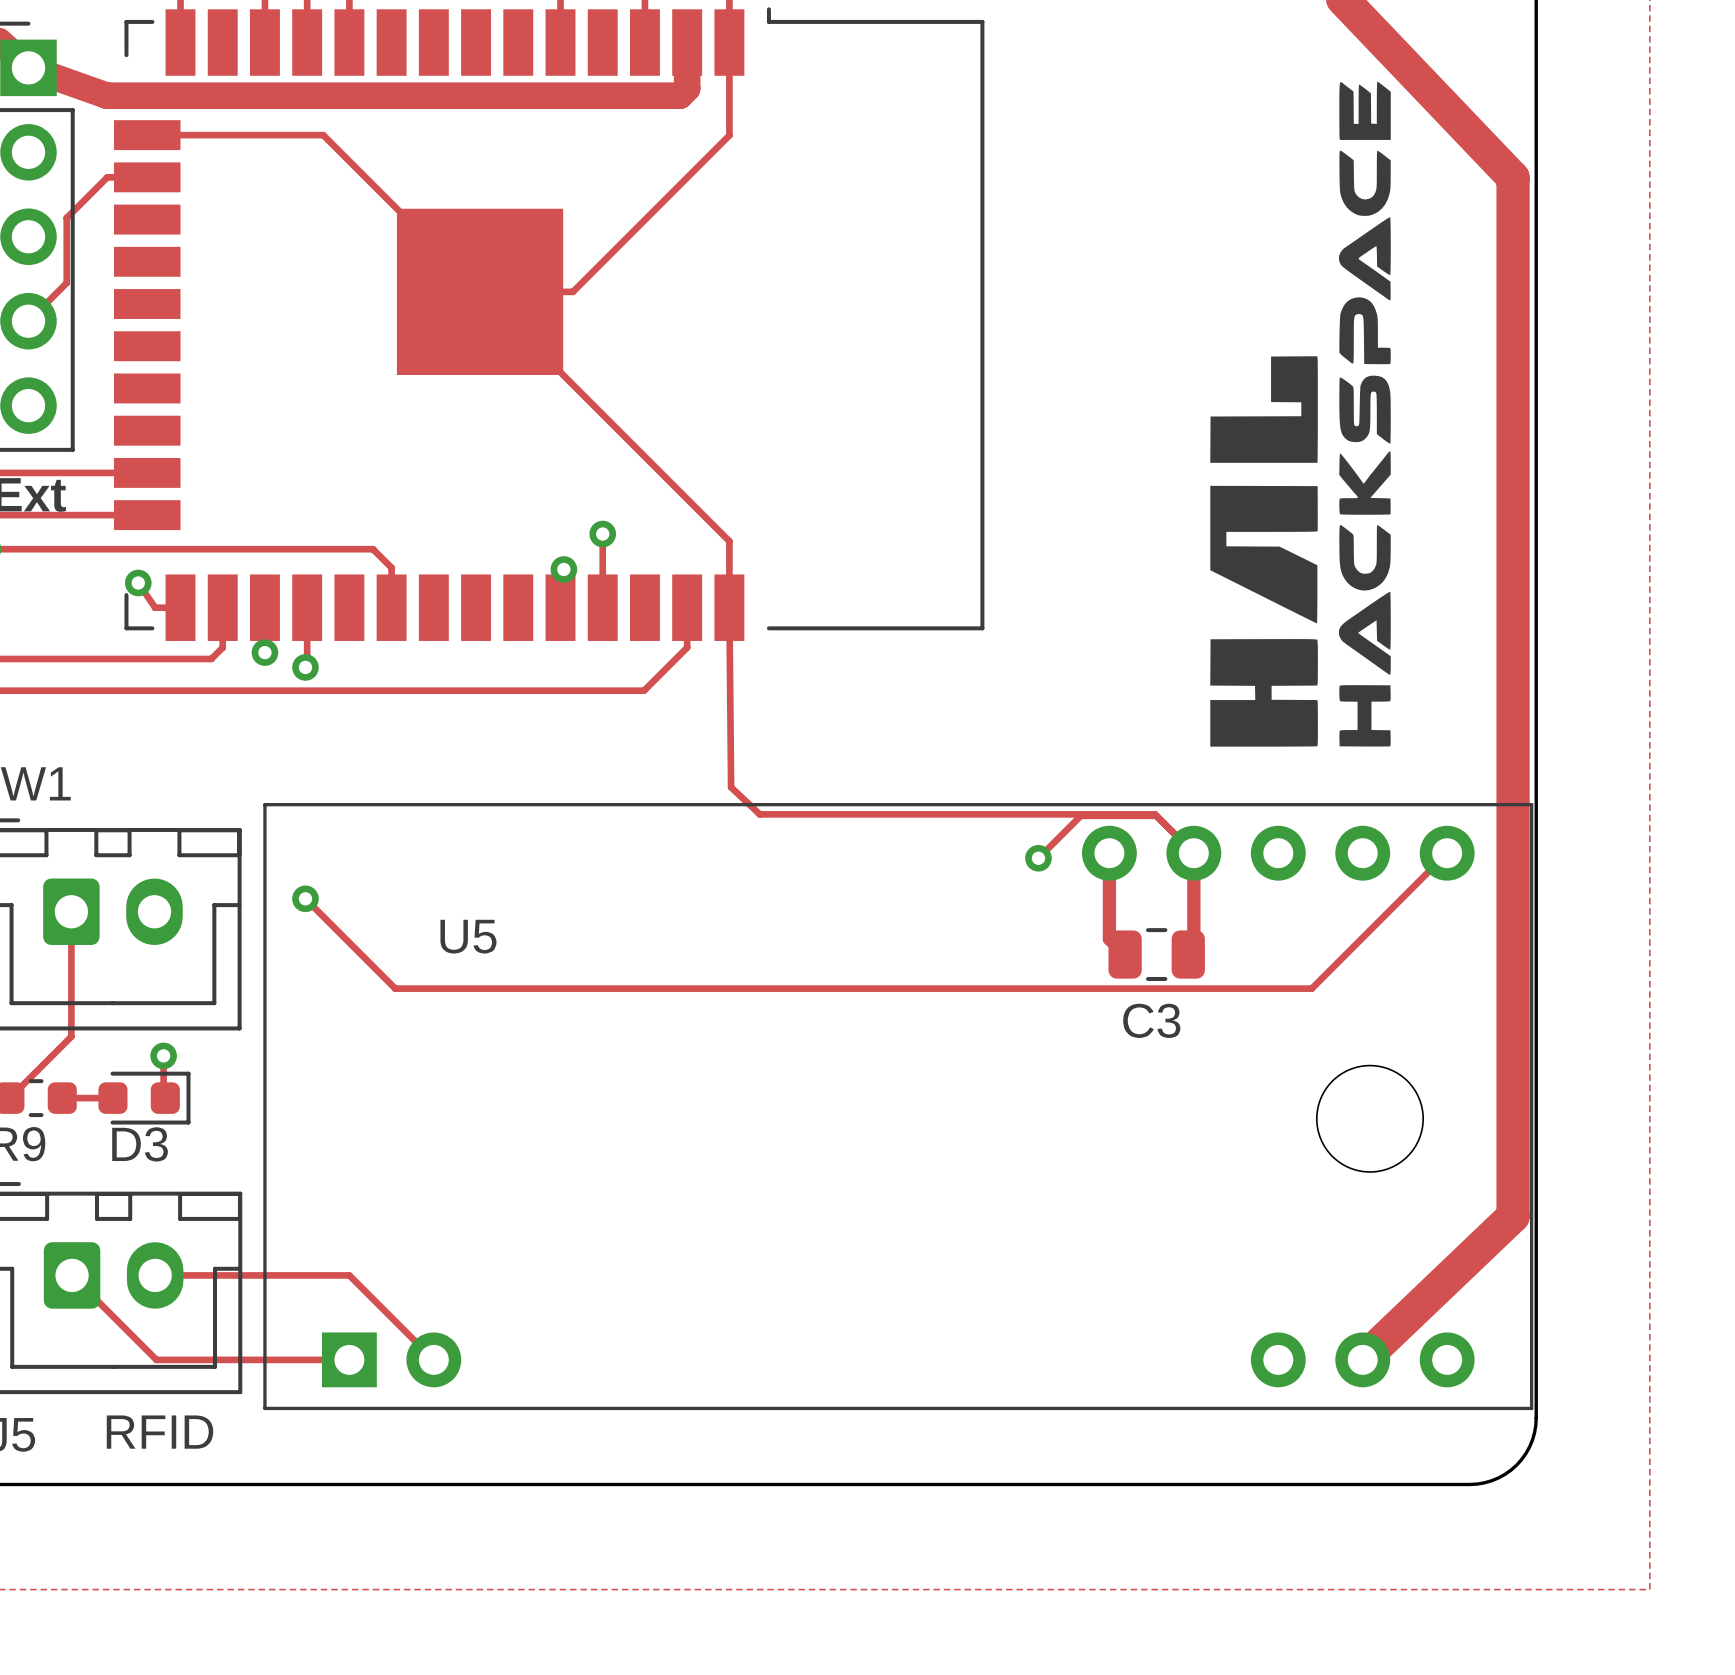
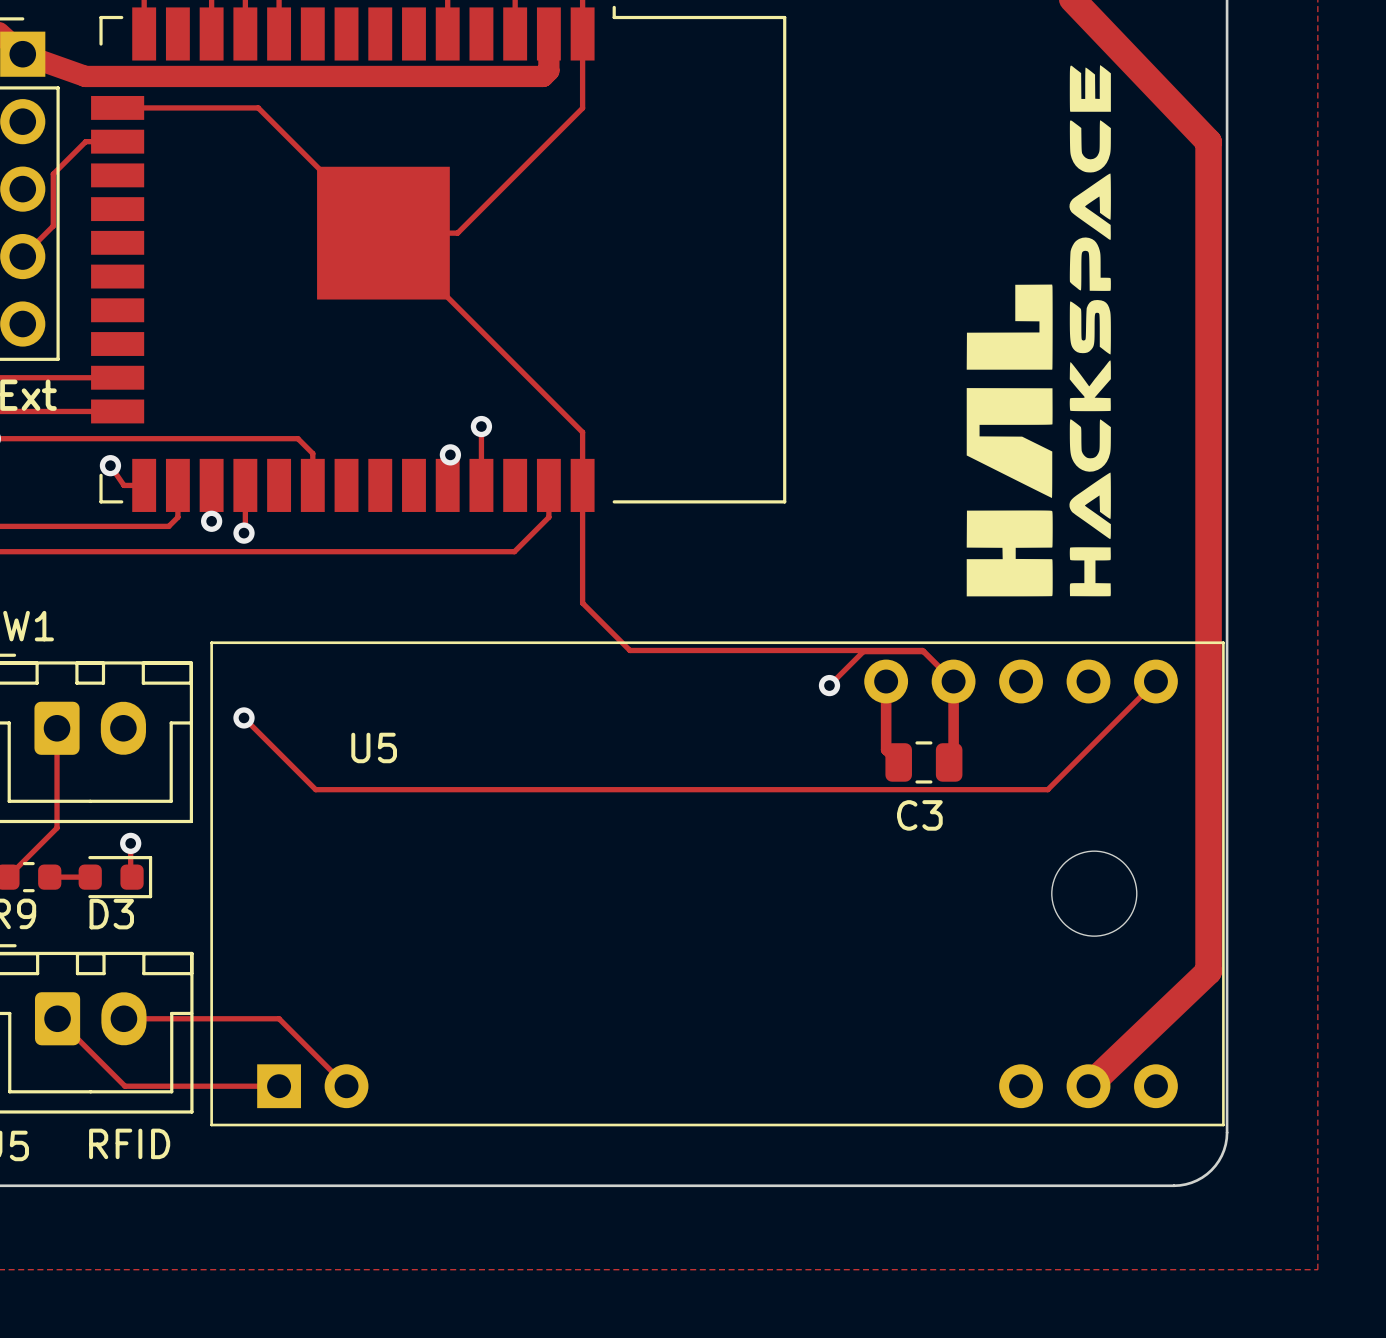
track: (729, 607) (731, 787) (759, 814) (788, 814) -> (582, 485) (582, 603) (629, 650)

